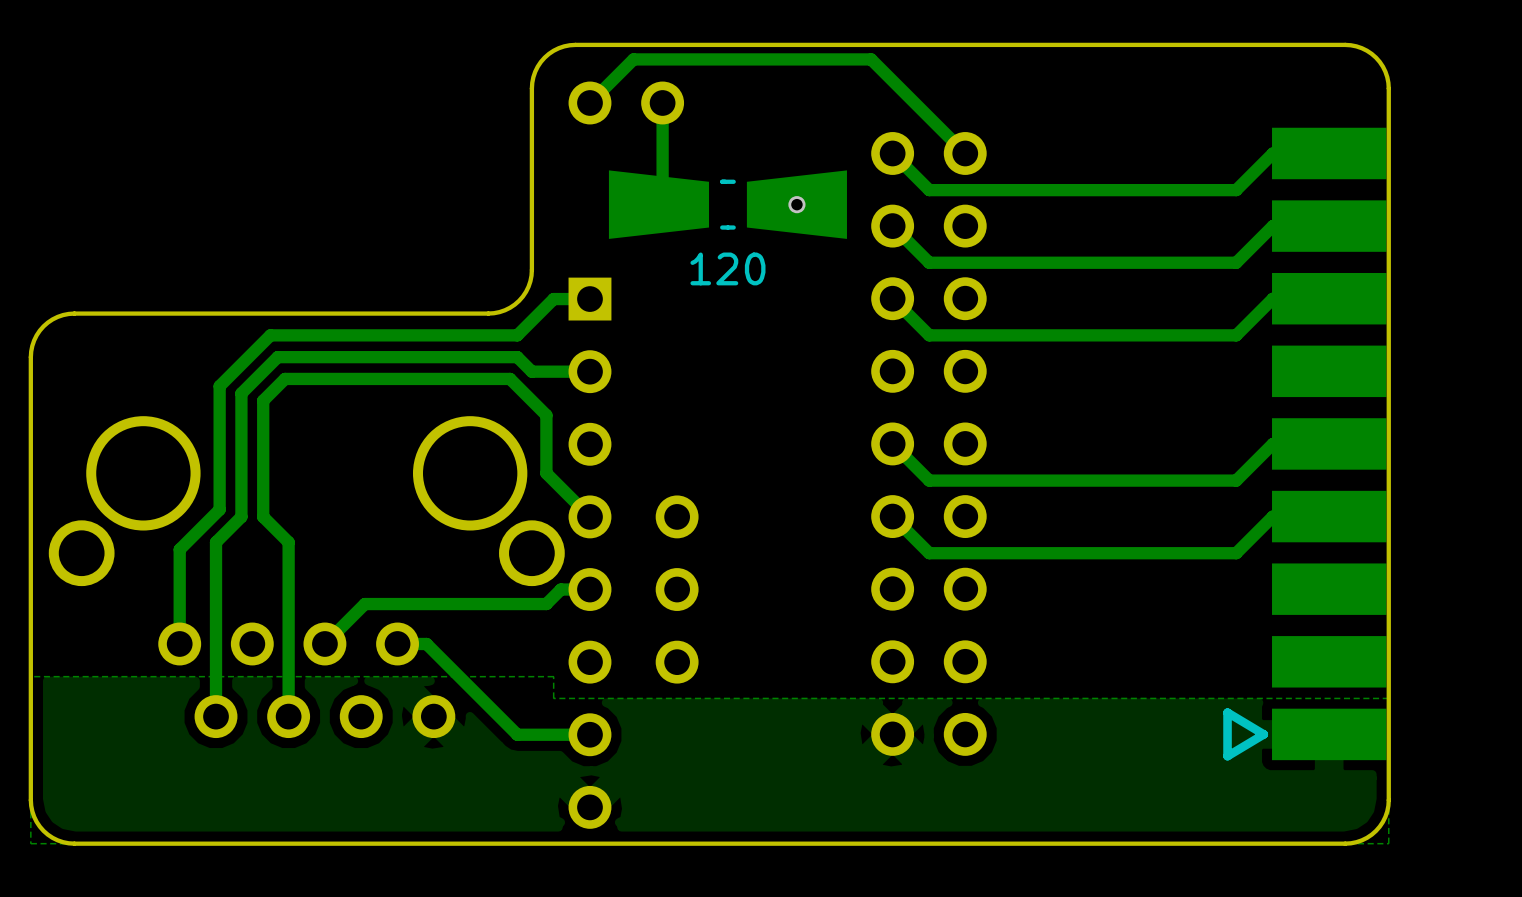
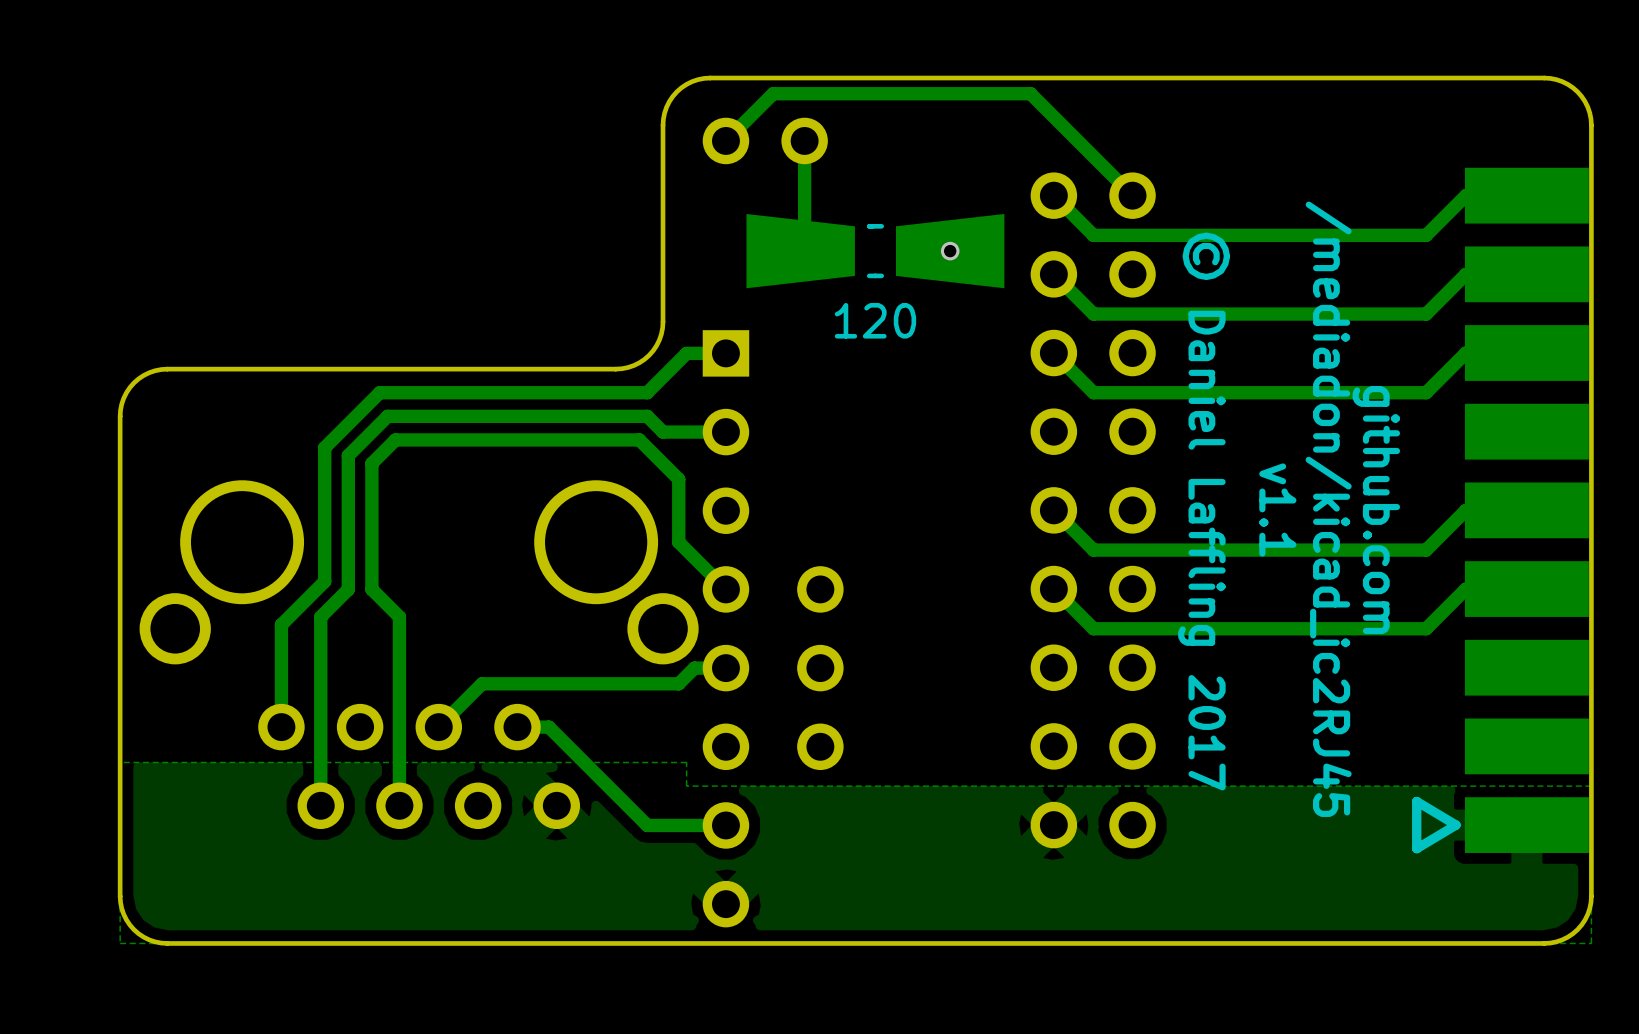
text: none -> /mediadon/kicad_ic2RJ45 (1328, 509)
text: none -> v1.1 (1277, 510)
text: none -> github.com (1376, 510)
text: none -> © Daniel Laffling 2017 (1204, 511)

